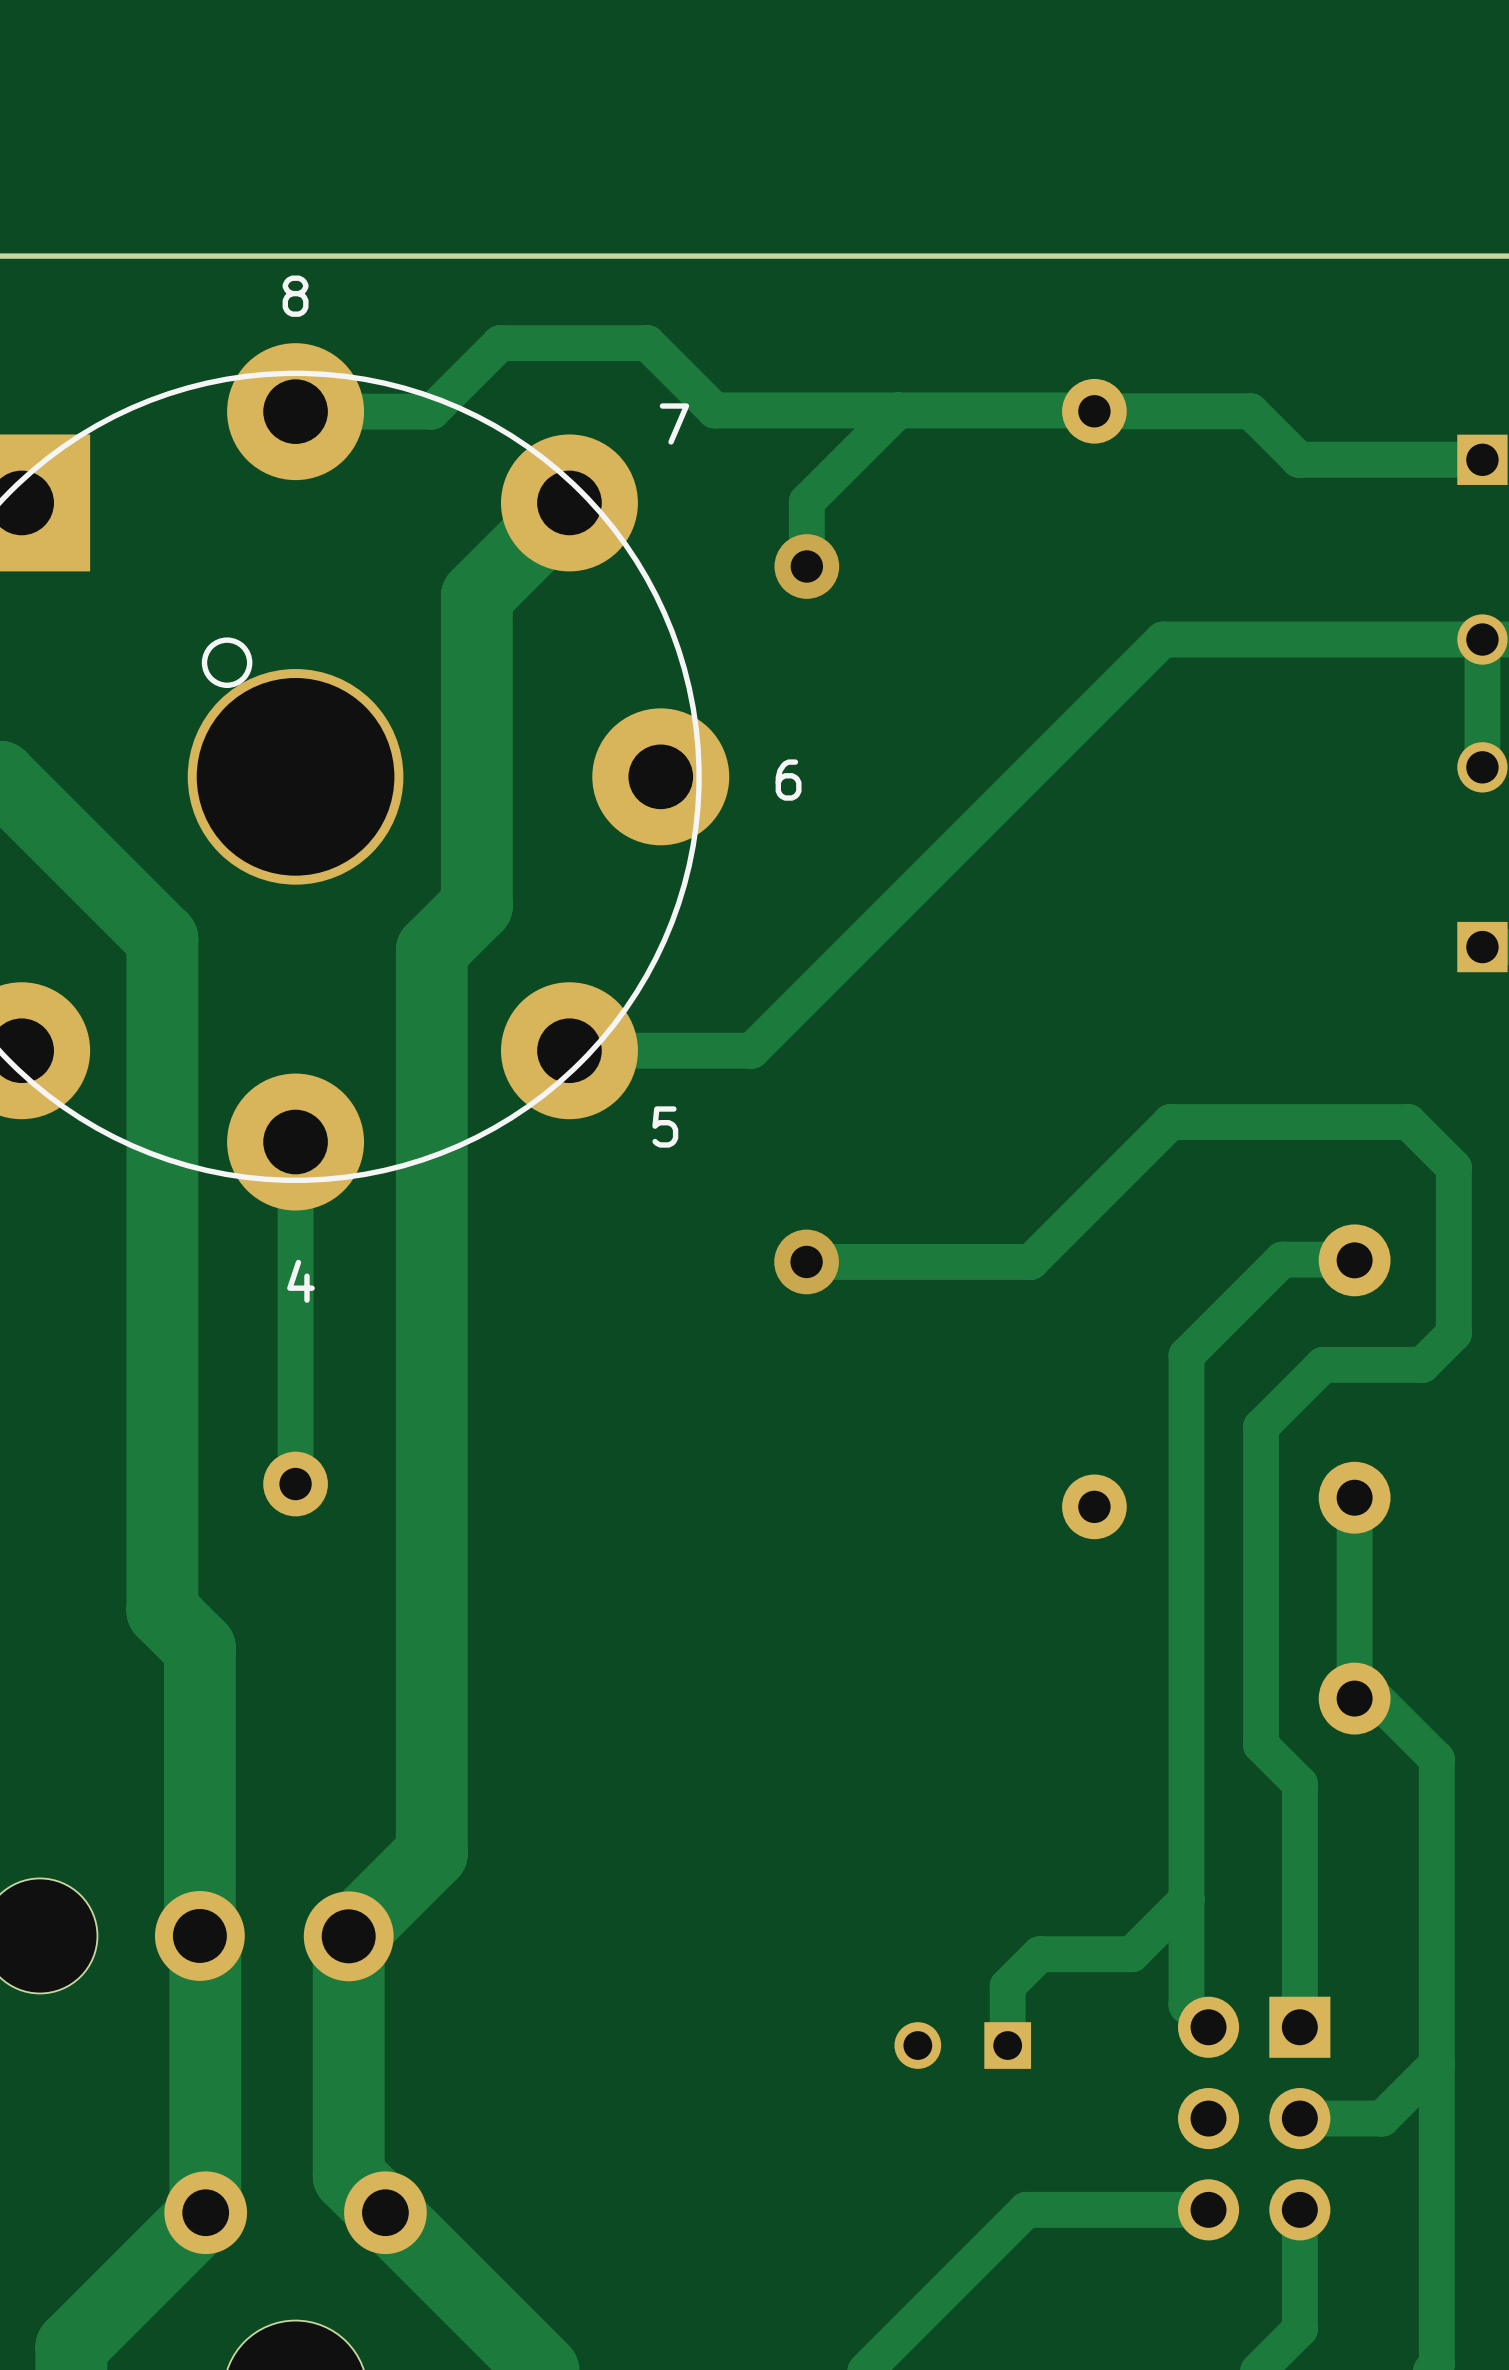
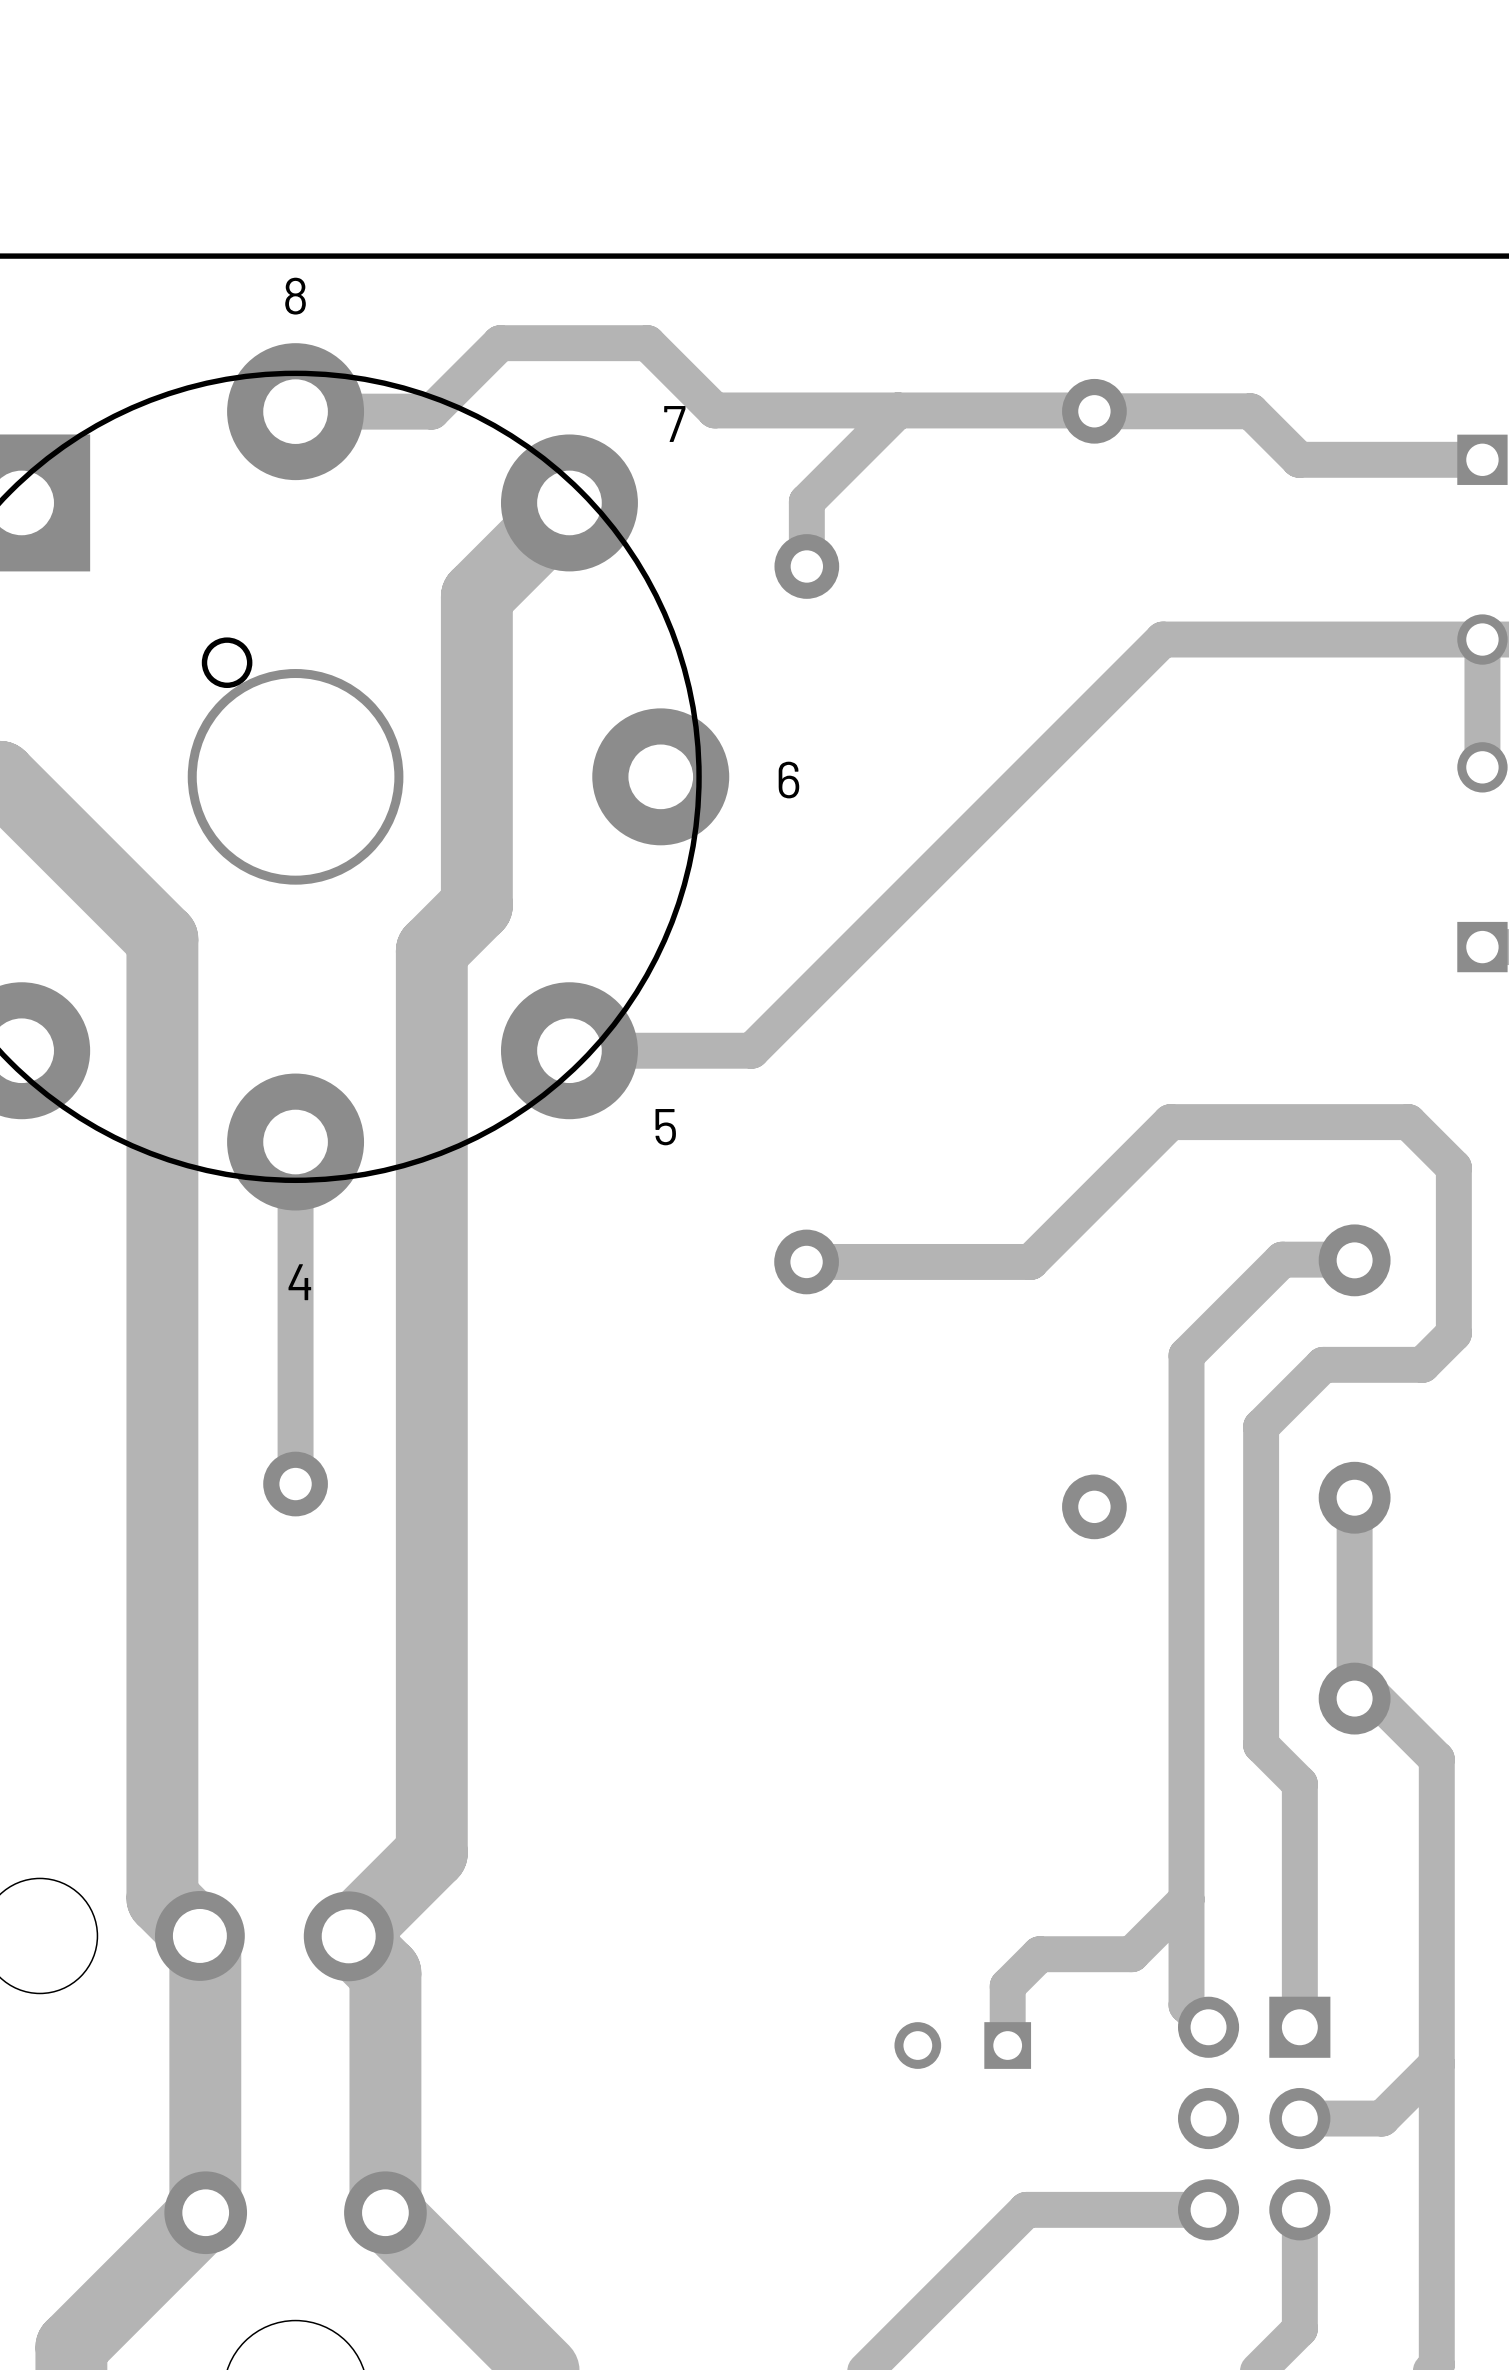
track: (162, 1610) (199, 1648) (199, 1935) -> (162, 1610) (162, 1898) (199, 1935)
track: (348, 1936) (348, 2176) (385, 2212) -> (348, 1936) (385, 1973) (385, 2212)

